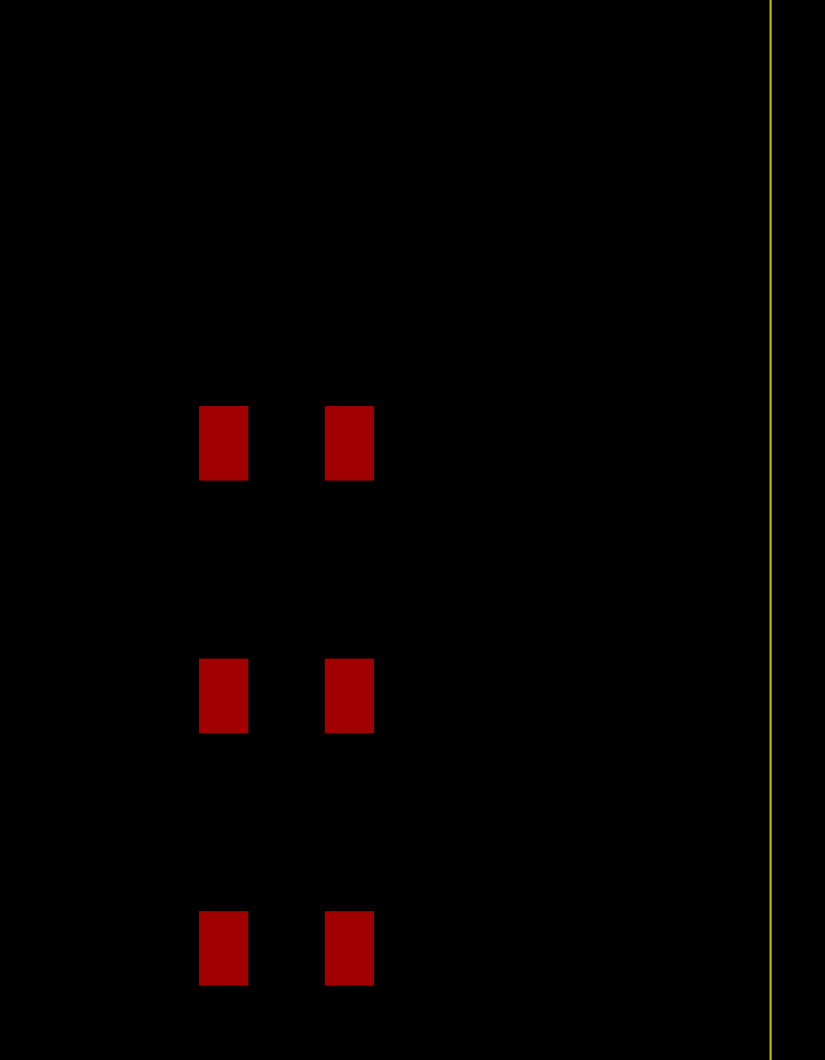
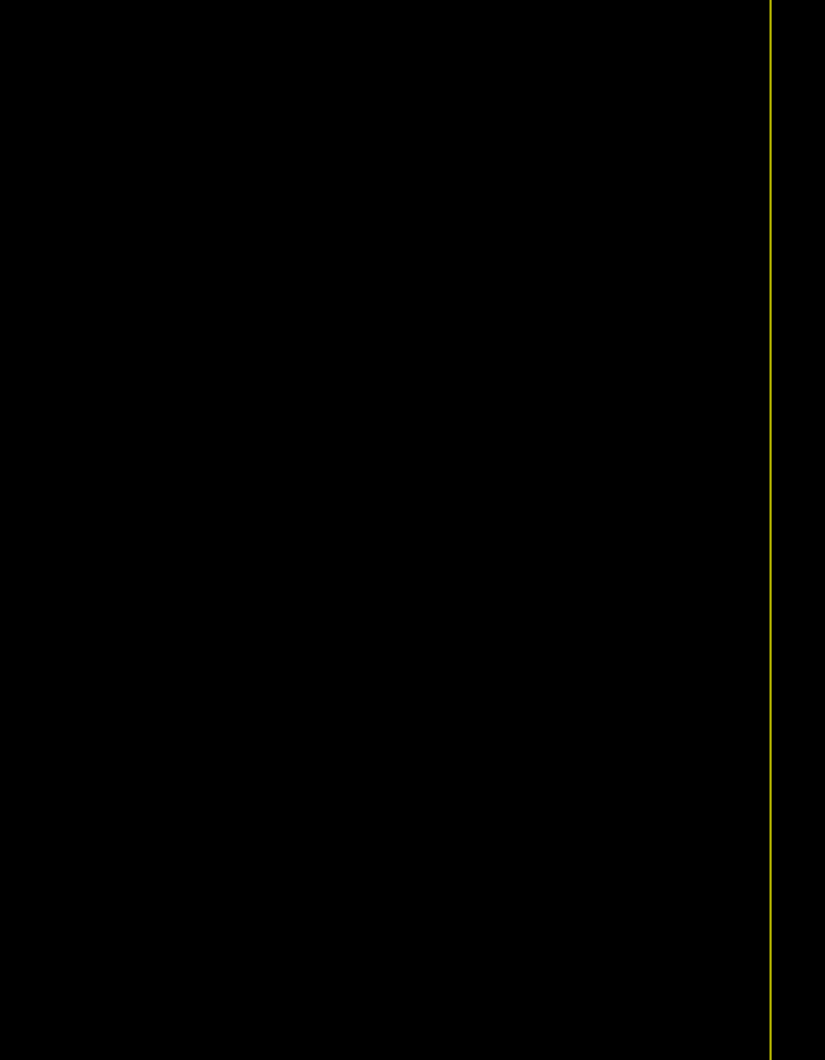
part: (286, 443) -> none
part: (286, 695) -> none
part: (286, 948) -> none

